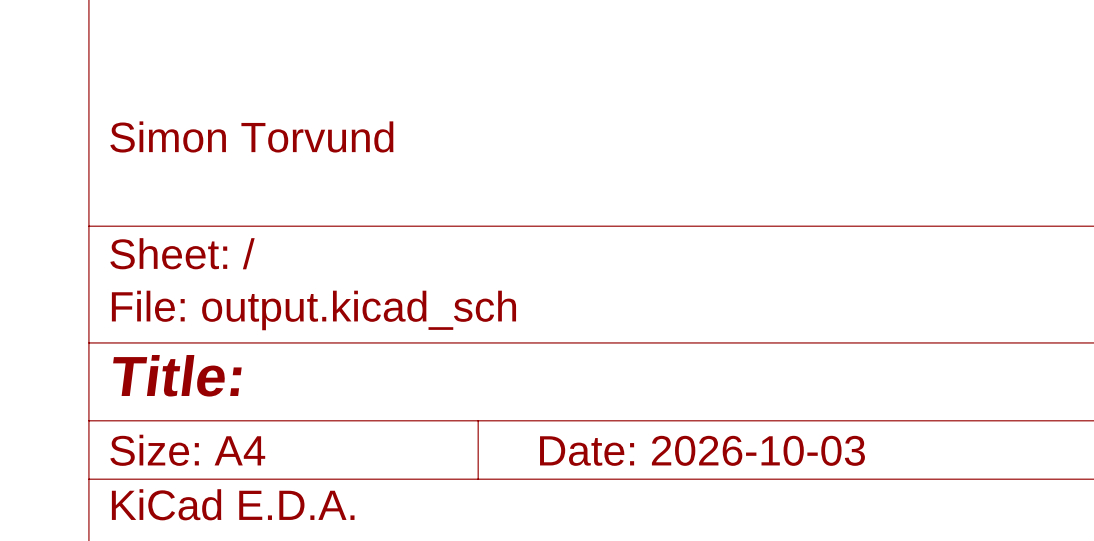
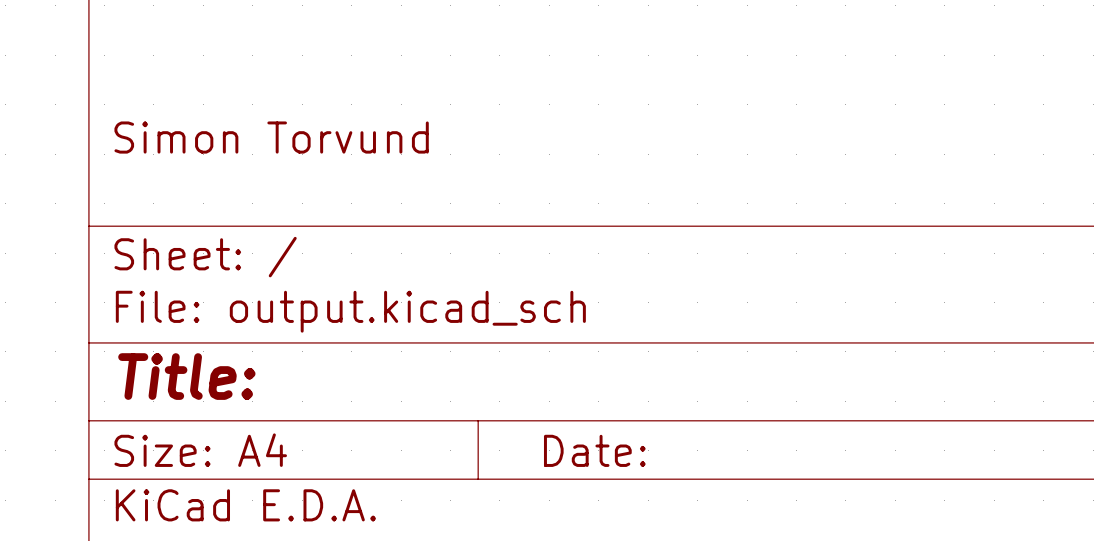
title block: Date: 2026-10-03 (702, 450) -> Date: (594, 450)

